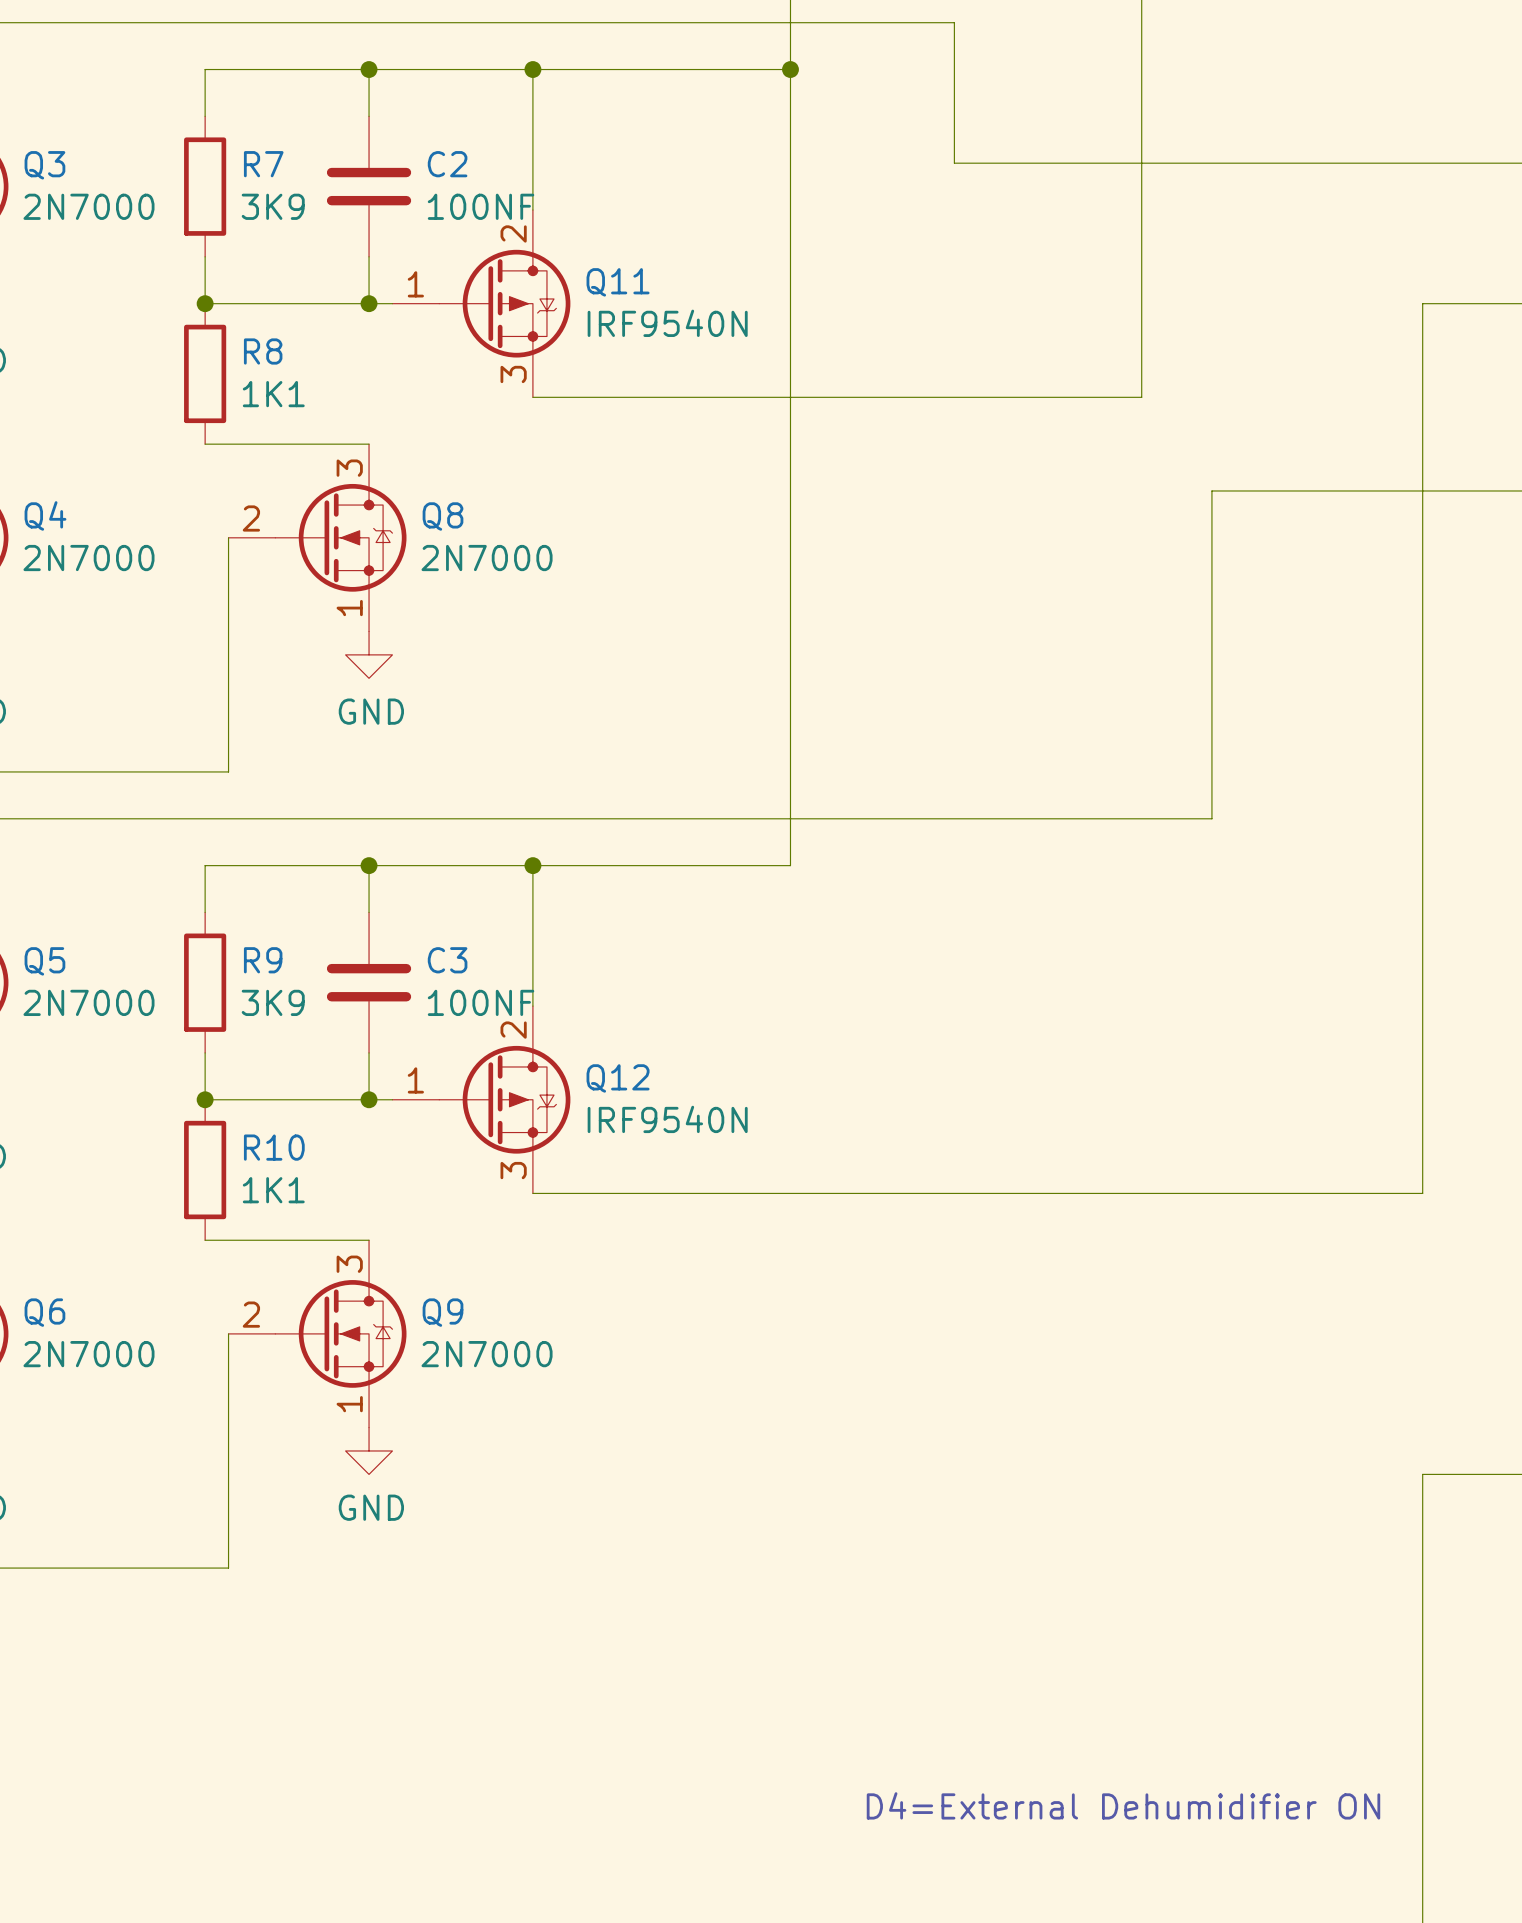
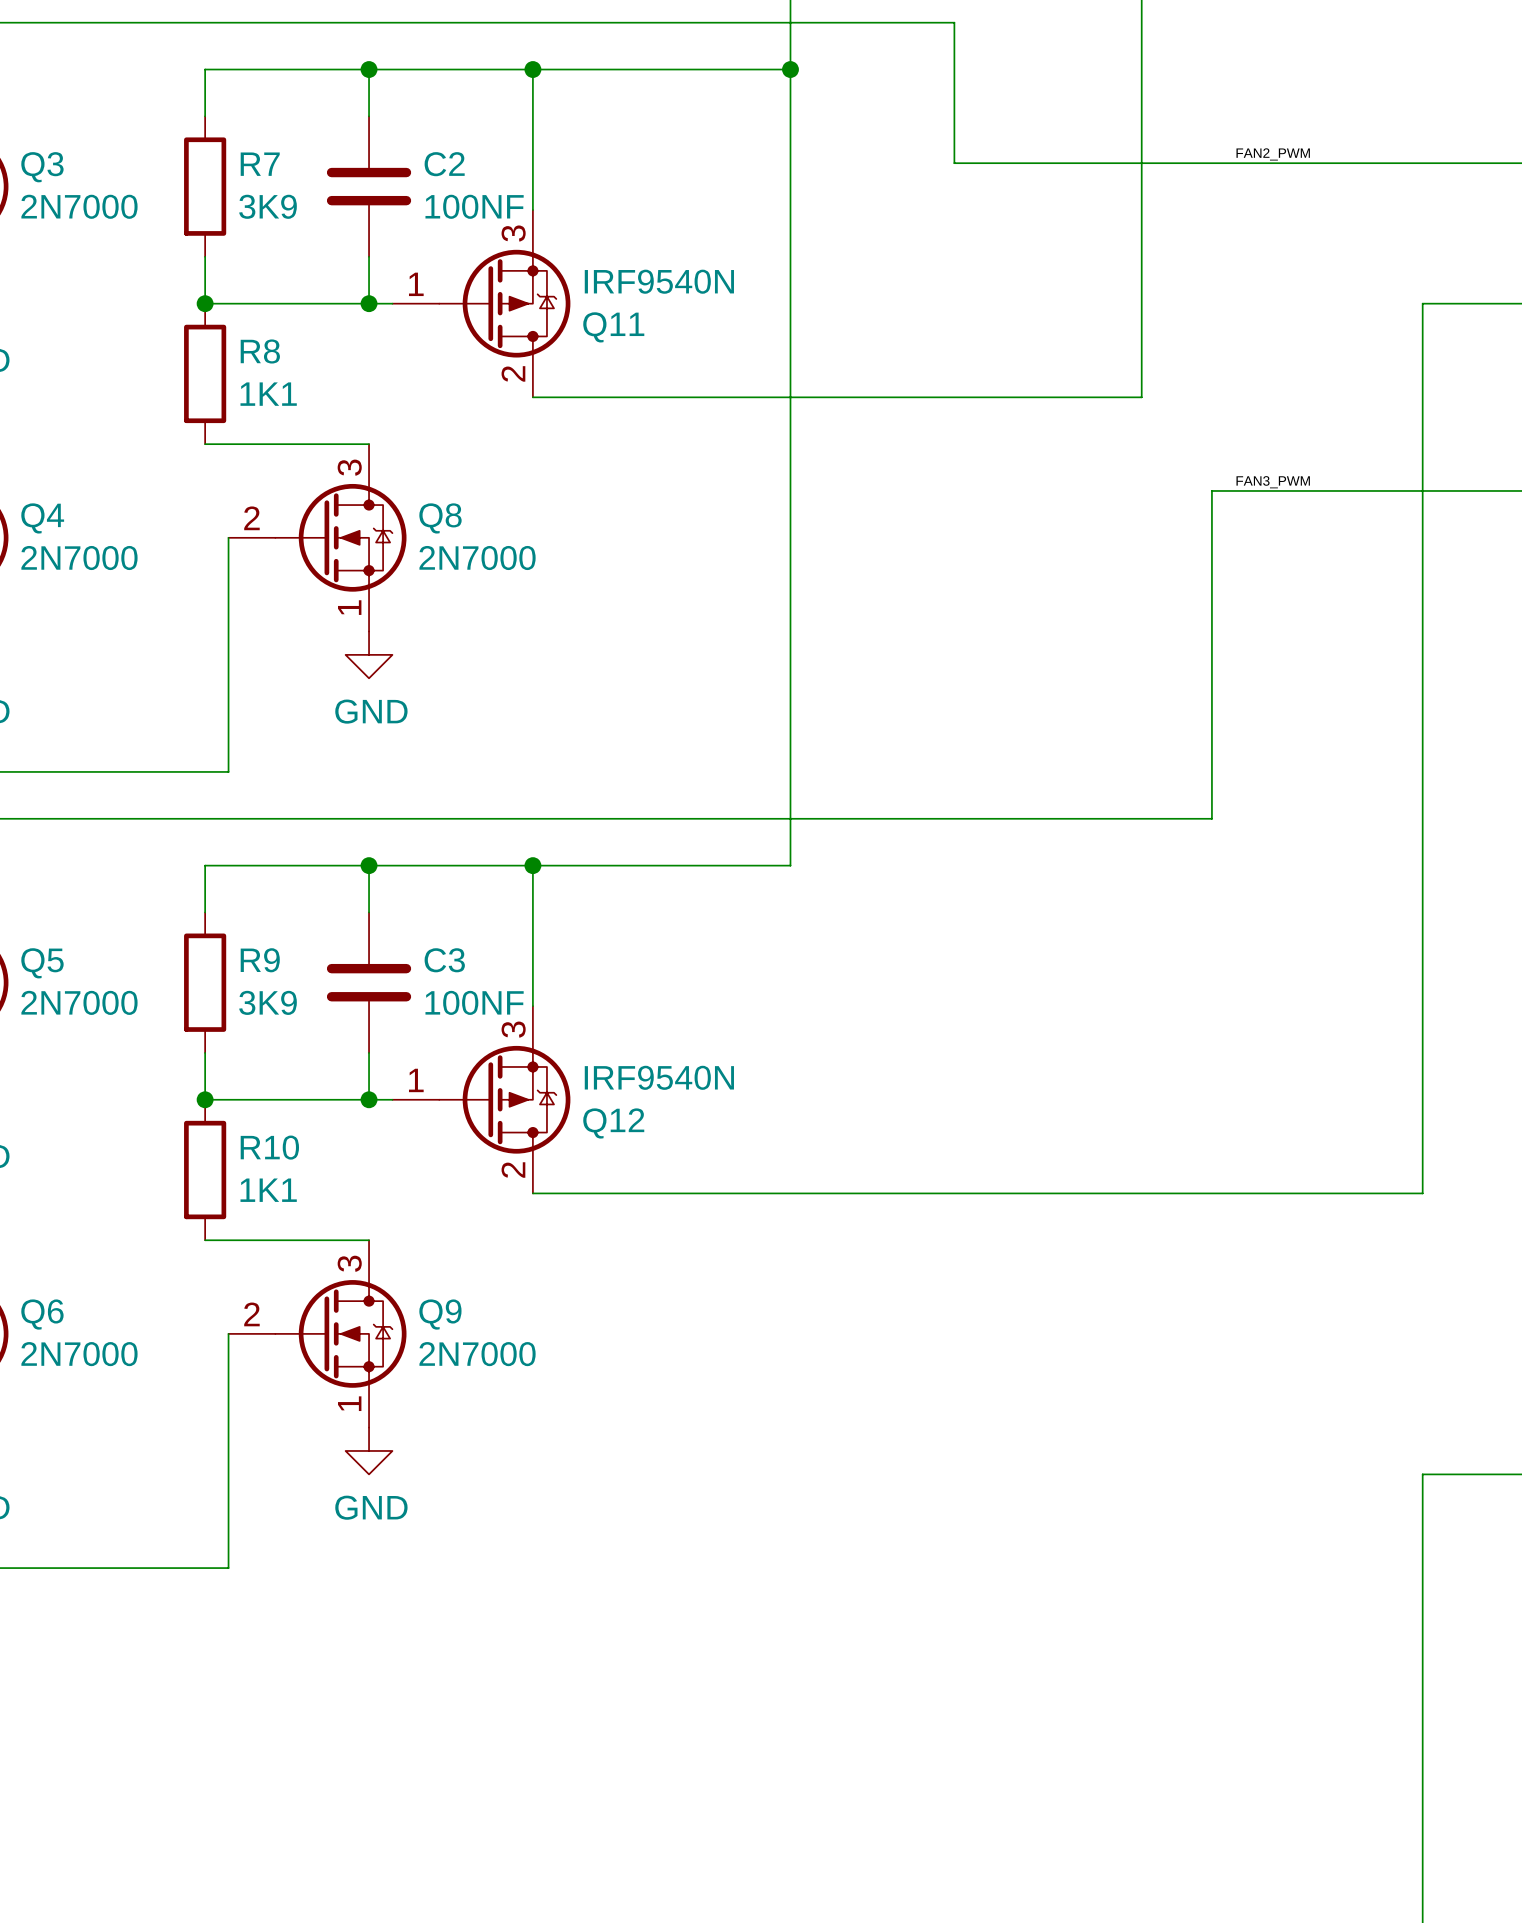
label: none -> FAN2_PWM (1273, 154)
Q11 flip: as is (504, 303) -> up-down (504, 303)
label: none -> FAN3_PWM (1273, 482)
Q12 flip: as is (504, 1099) -> up-down (504, 1099)
text: D4=External Dehumidifier ON (1123, 1805) -> none

